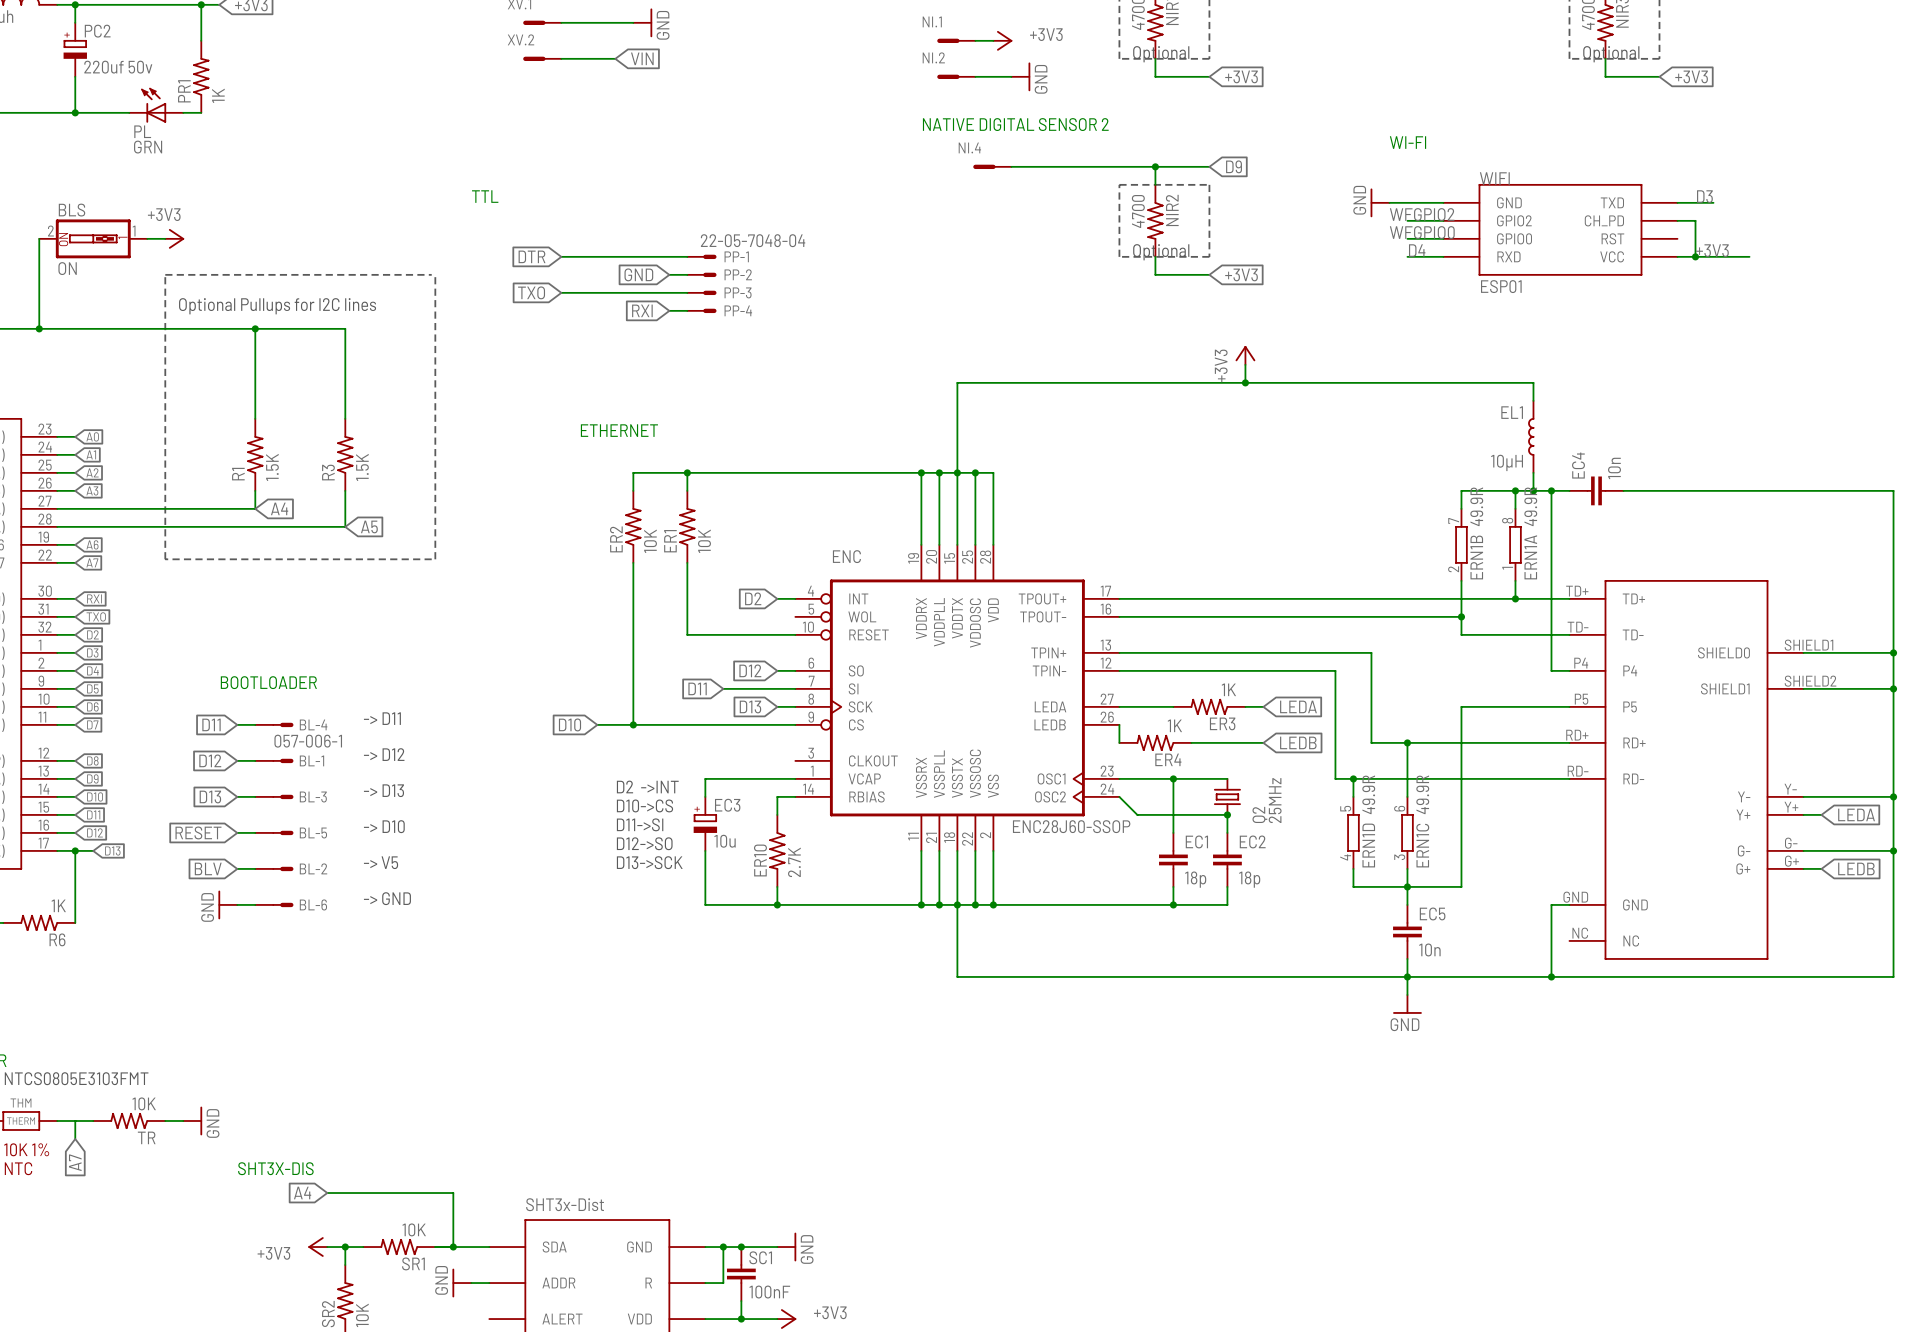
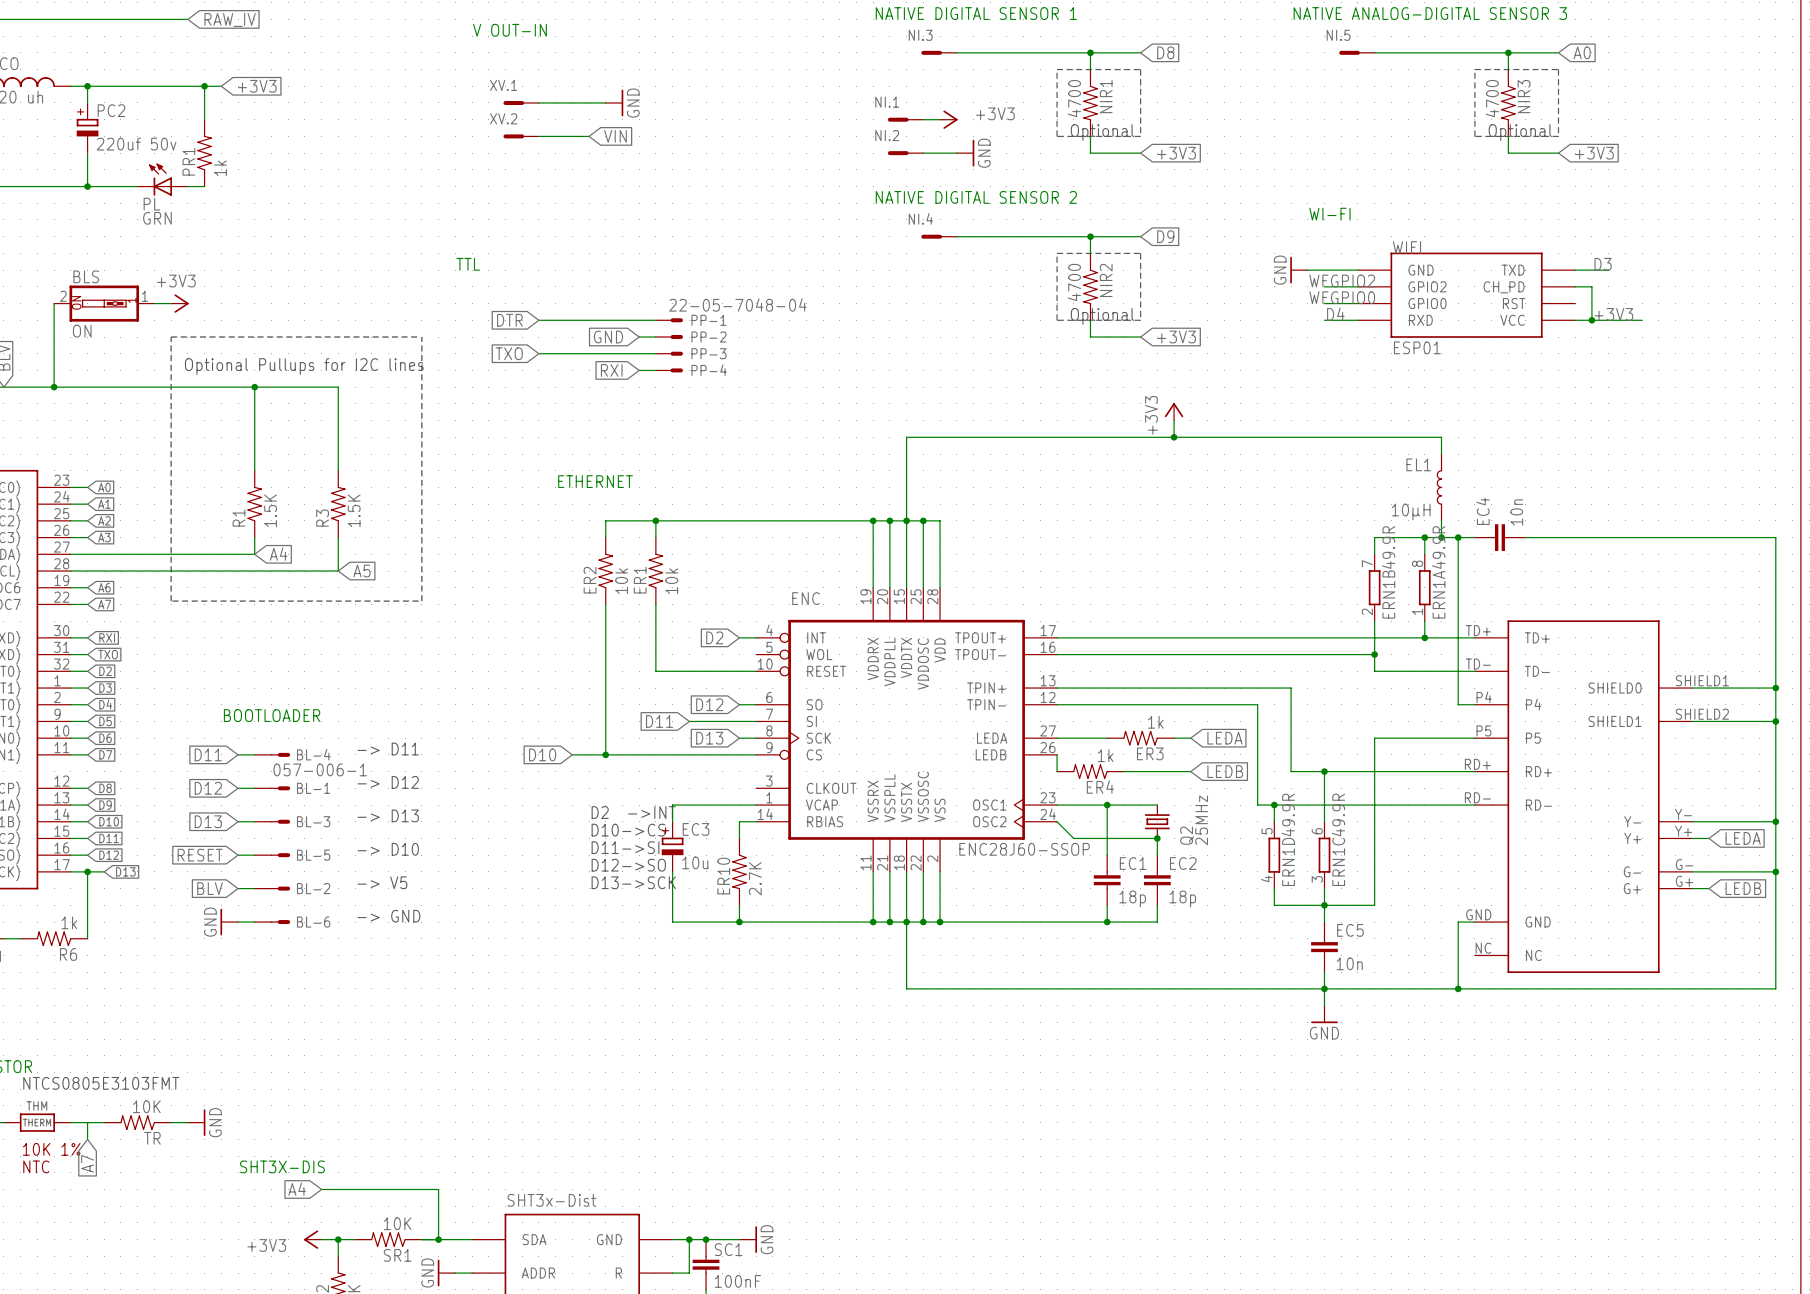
PR1 value: 1K (218, 95) -> 1k (220, 168)
ER2 value: 10K (650, 541) -> 10k (621, 581)
ER1 value: 10K (704, 541) -> 10k (671, 581)
ER3 value: 1K (1228, 689) -> 1k (1155, 722)
ER4 value: 1K (1174, 725) -> 1k (1105, 755)
R6 value: 1K (58, 905) -> 1k (69, 922)

